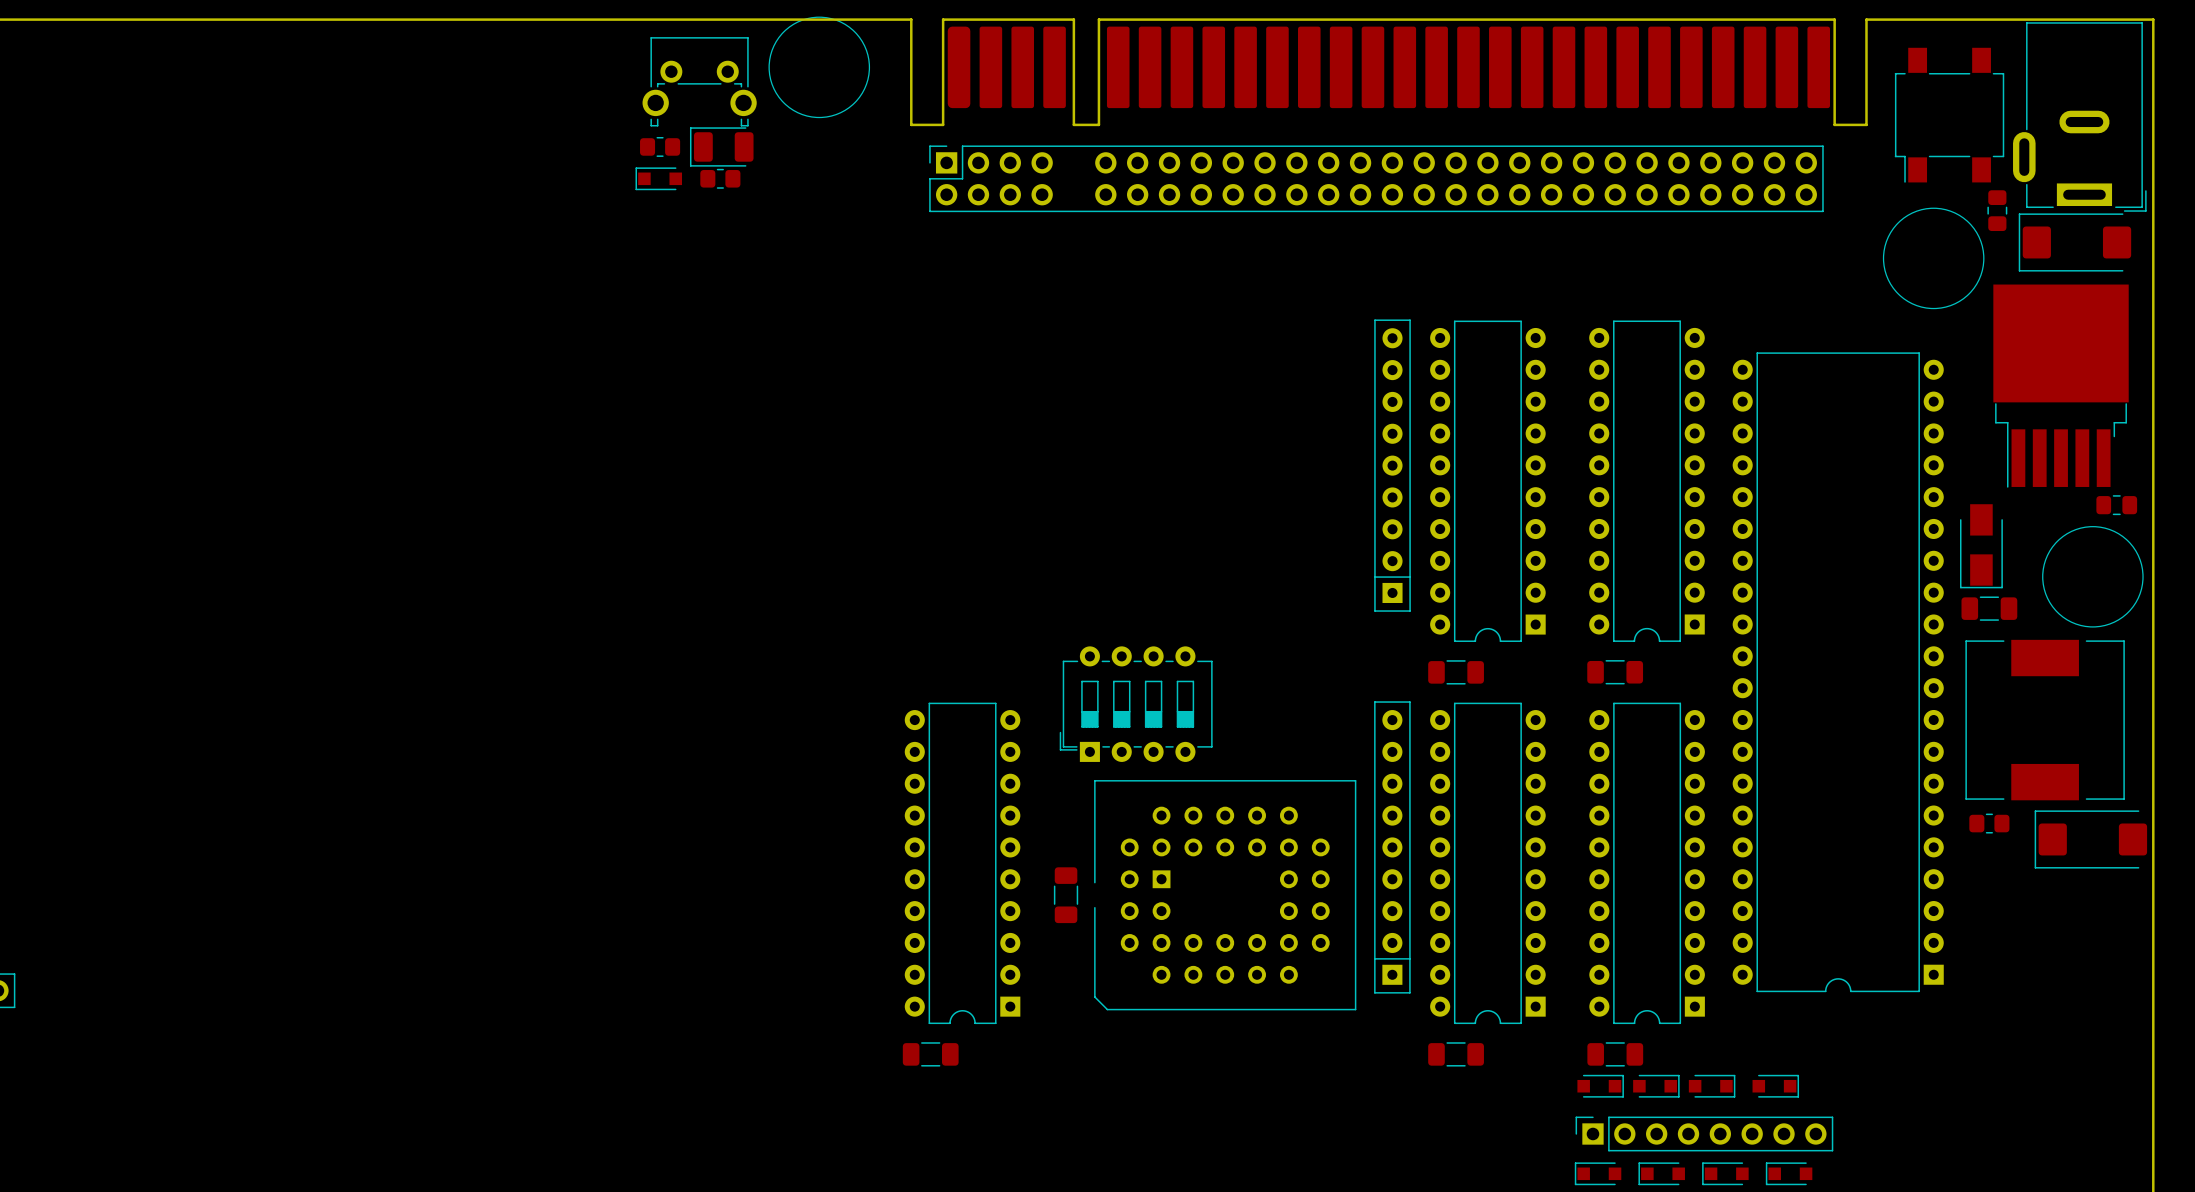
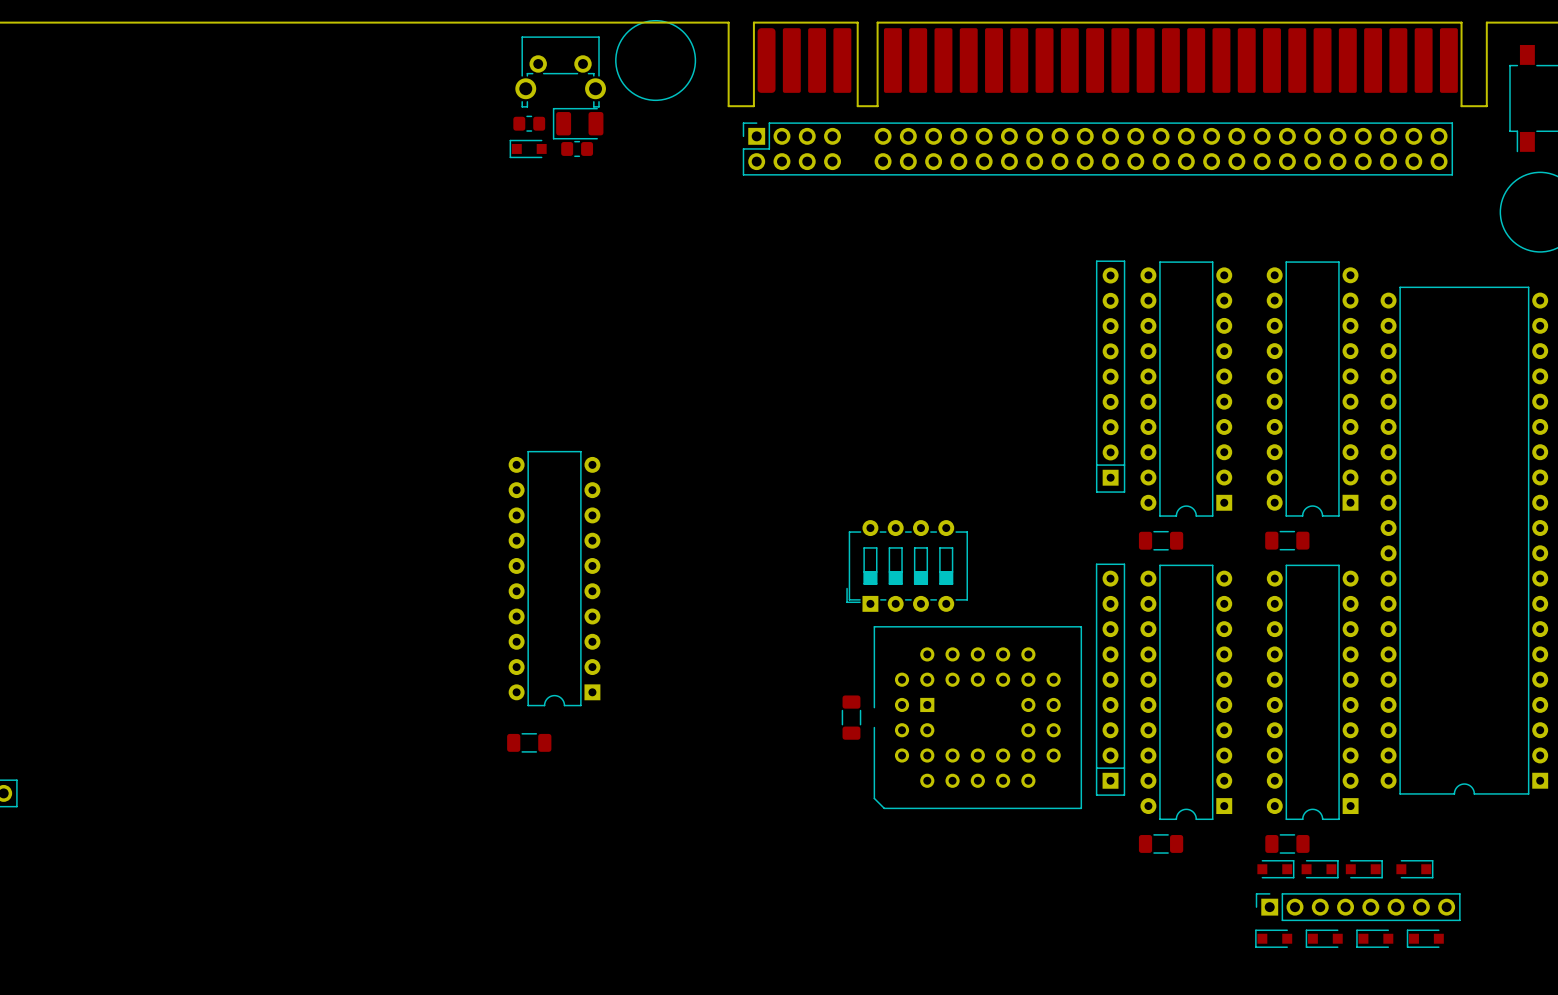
part position: (962, 863) -> (554, 578)
part position: (930, 1054) -> (529, 742)

